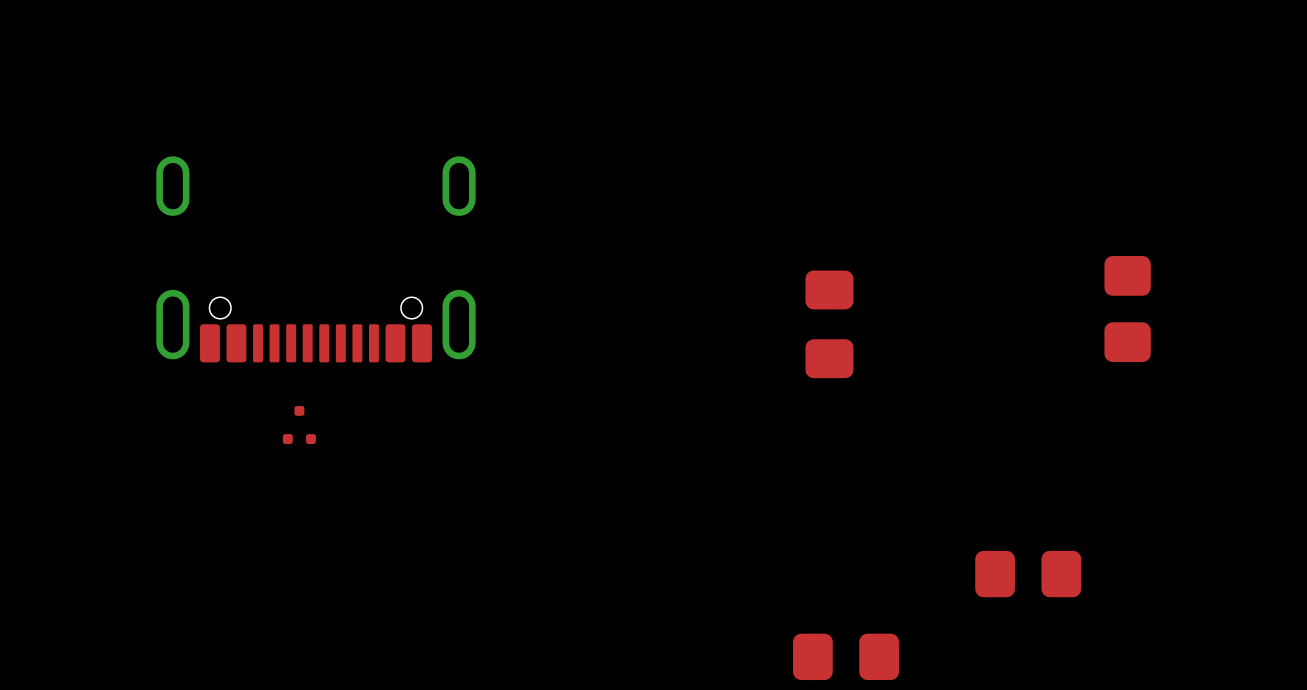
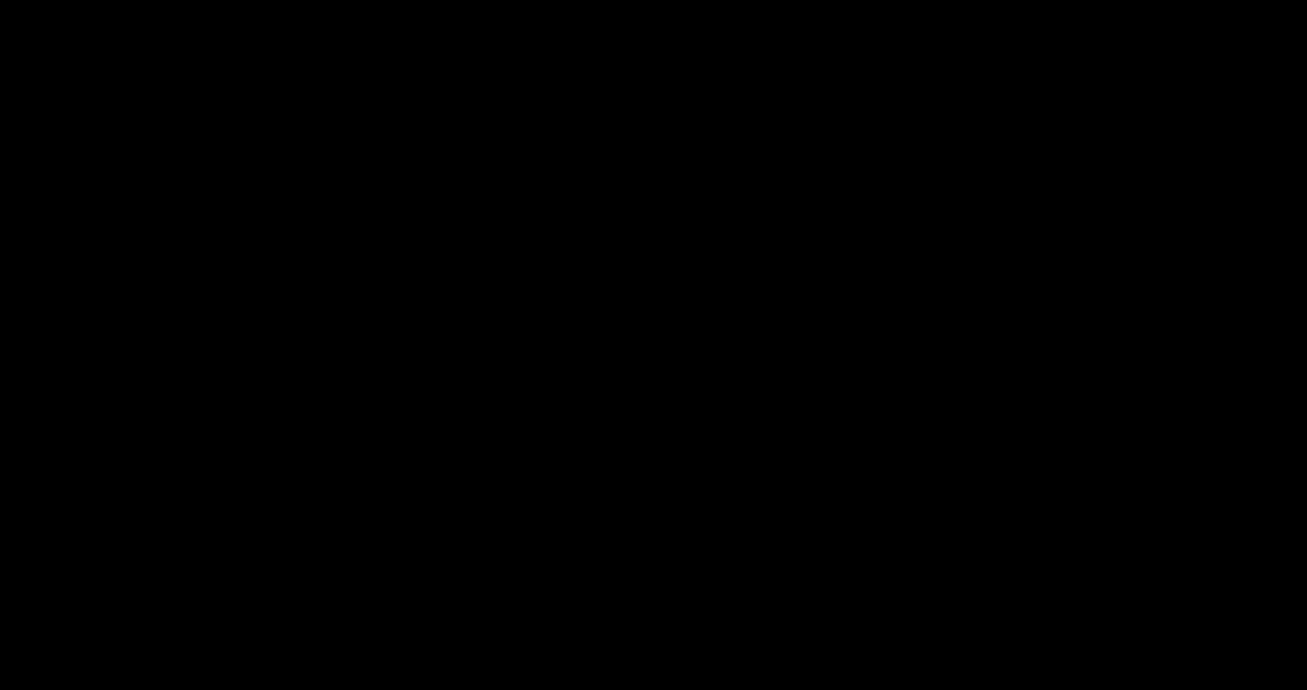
part: (315, 259) -> none
part: (1127, 309) -> none
part: (829, 324) -> none
part: (299, 424) -> none
part: (1028, 574) -> none
part: (846, 656) -> none

